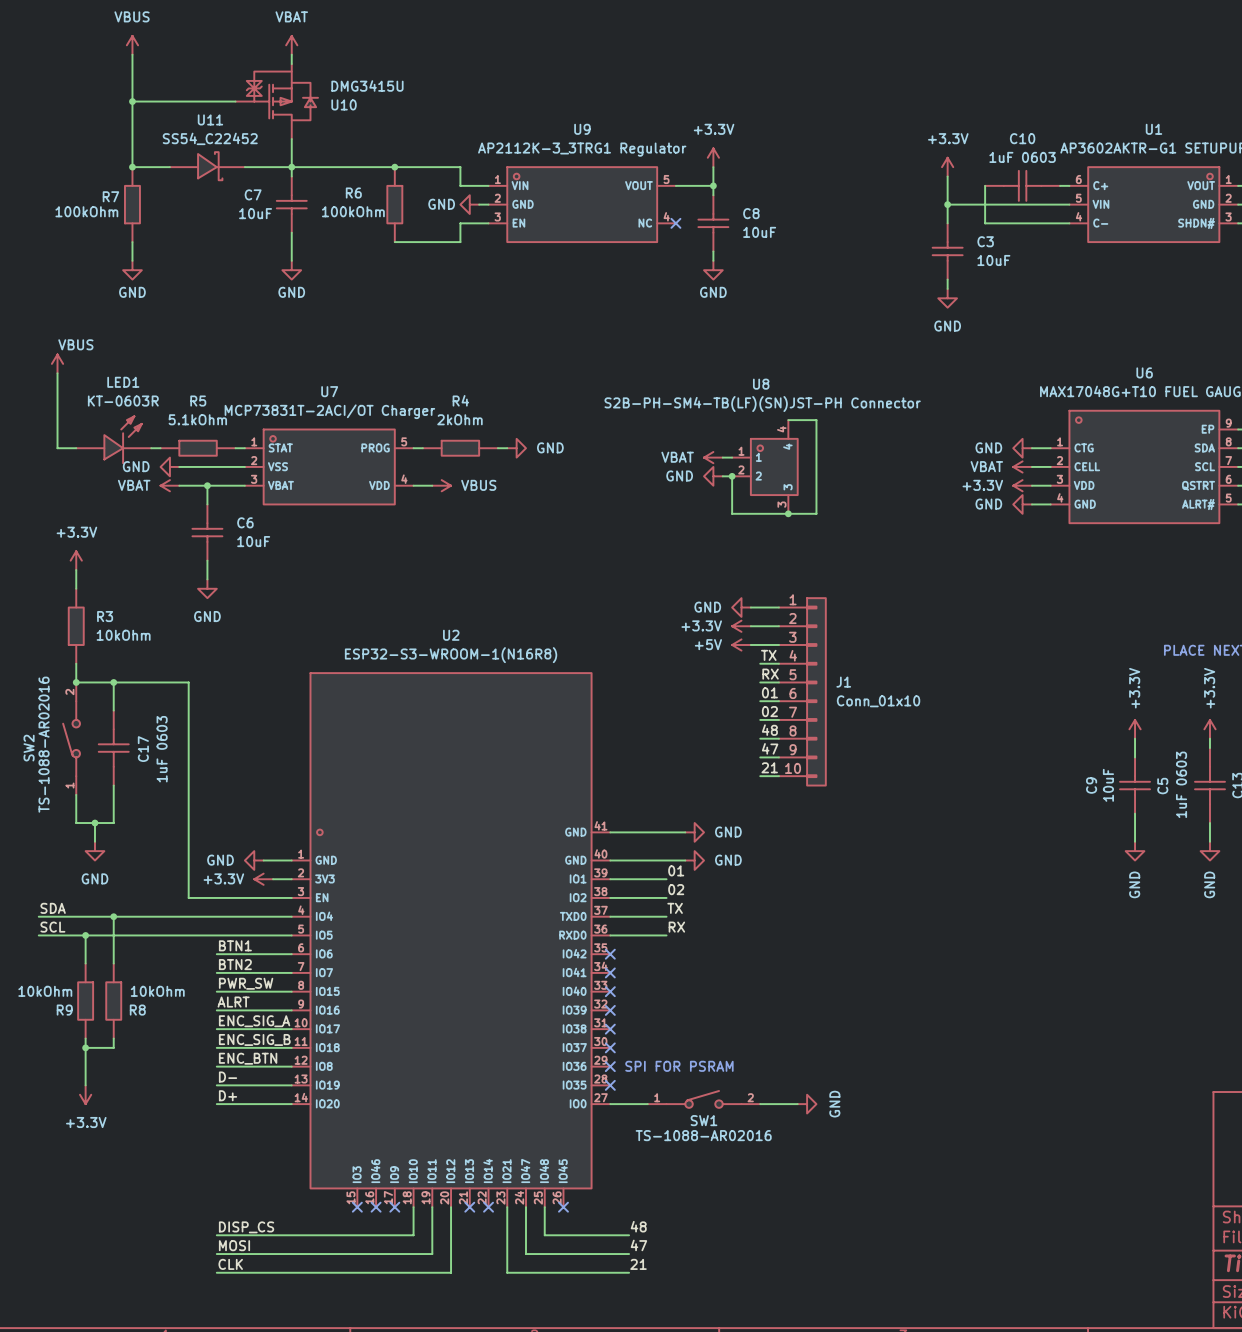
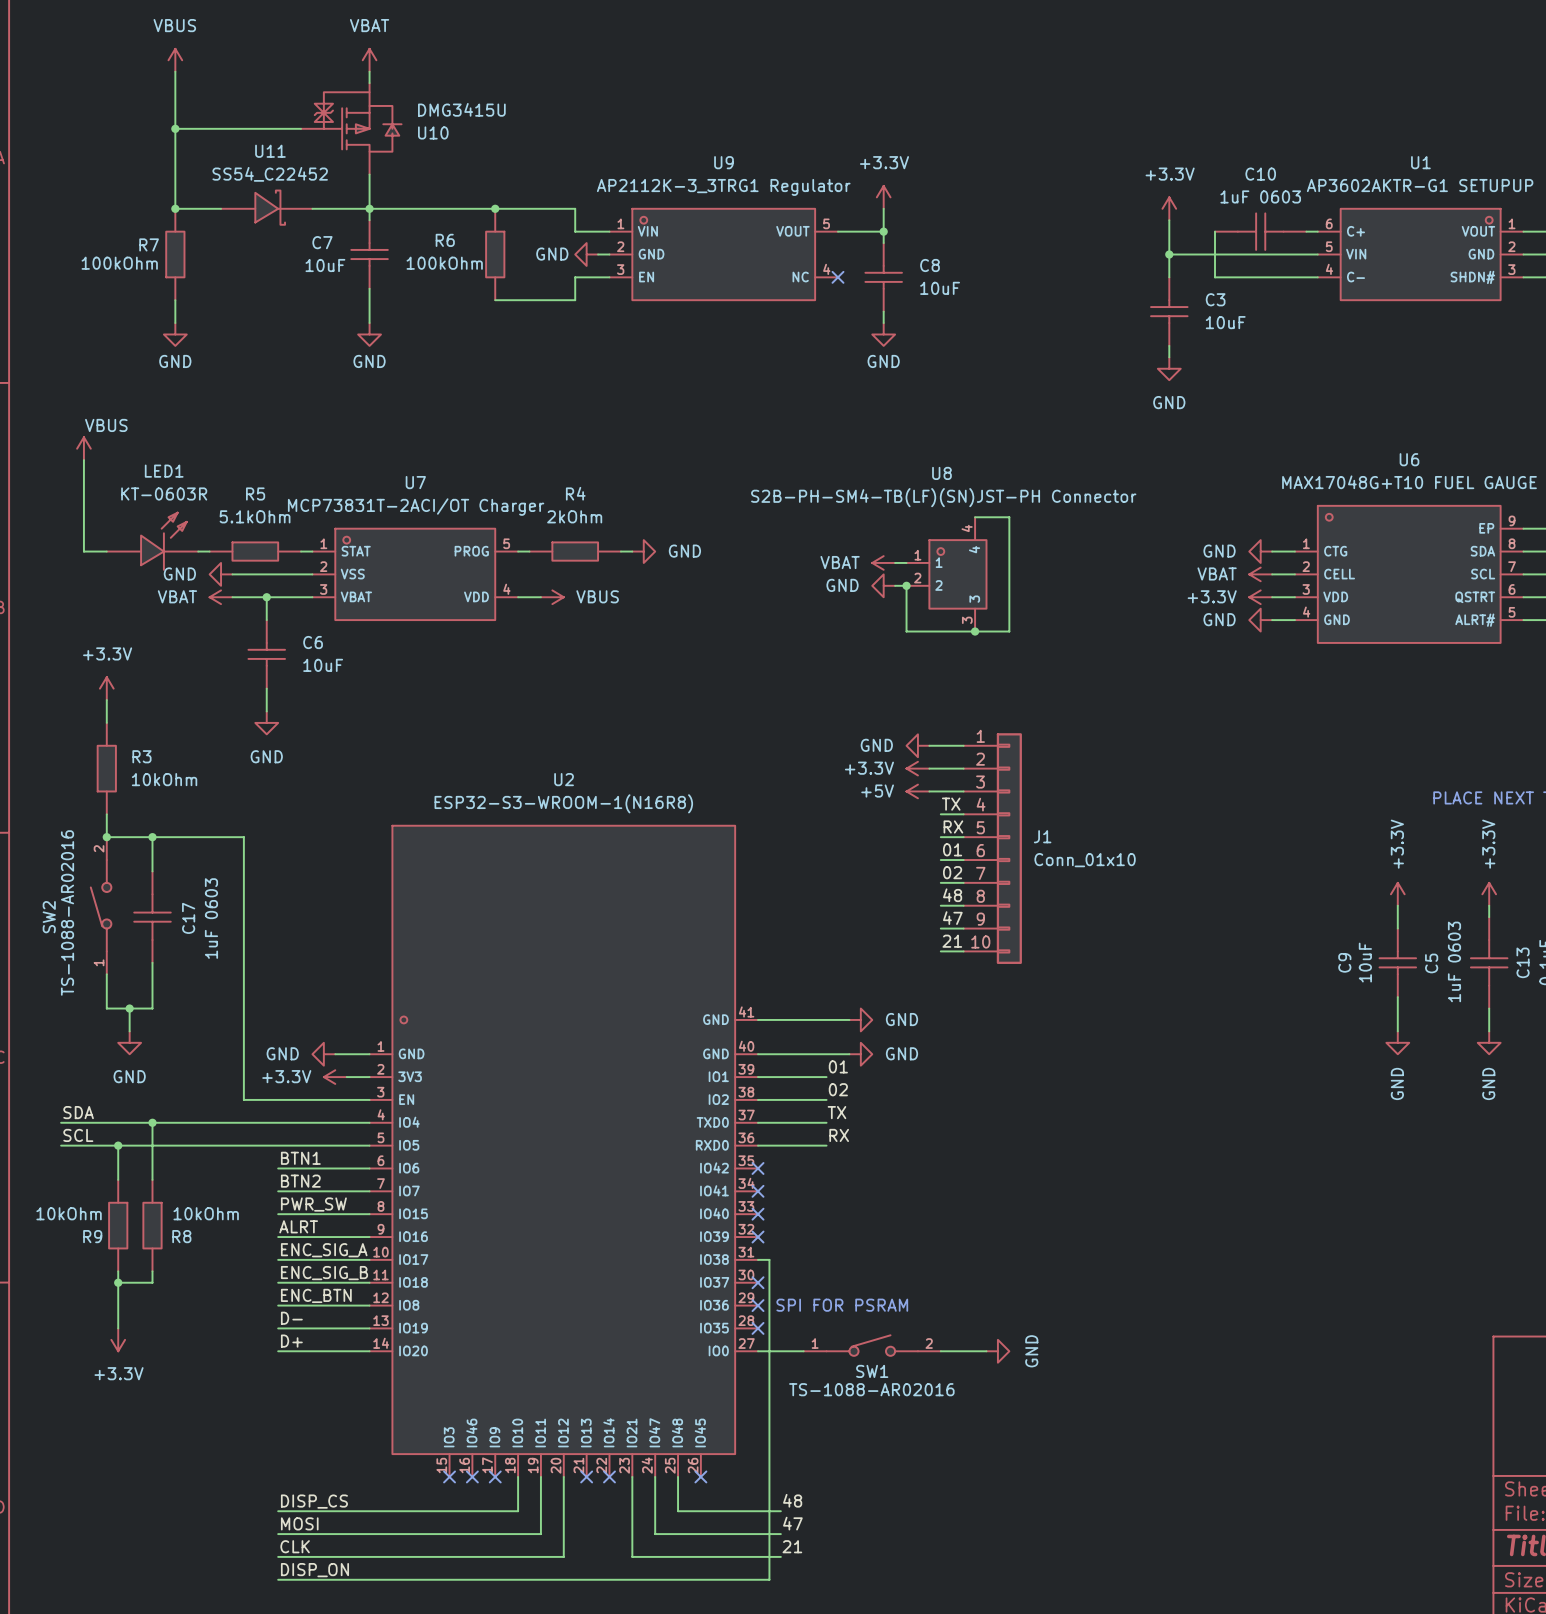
wire: none -> (758, 1259) (769, 1259) (769, 1579) (278, 1579)
no-connect mark: (610, 1029) -> none
label: none -> DISP_ON (314, 1570)

